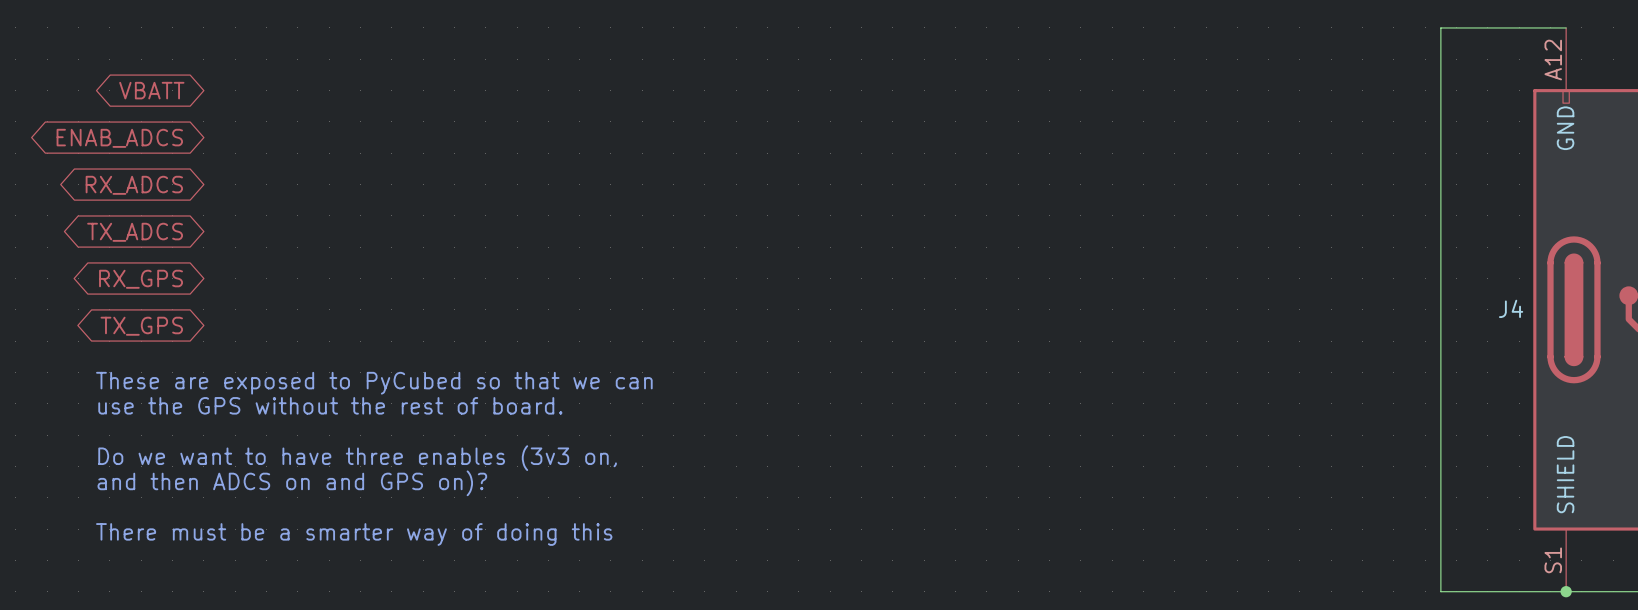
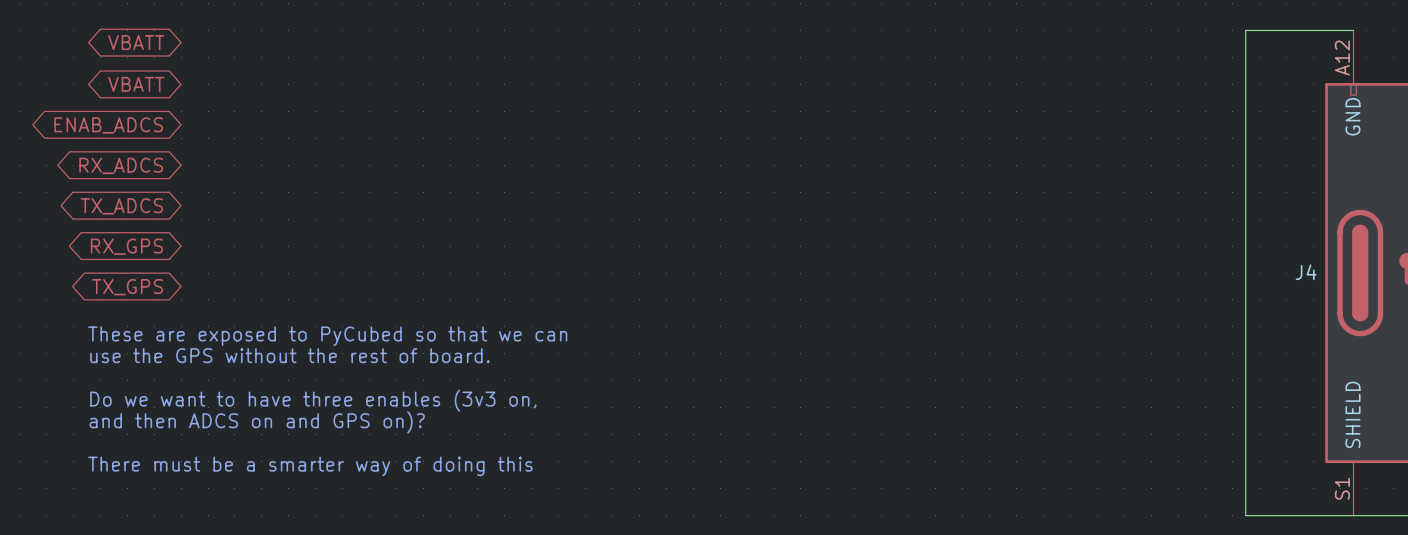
global label: none -> VBATT (136, 42)
junction: (1566, 591) -> none

